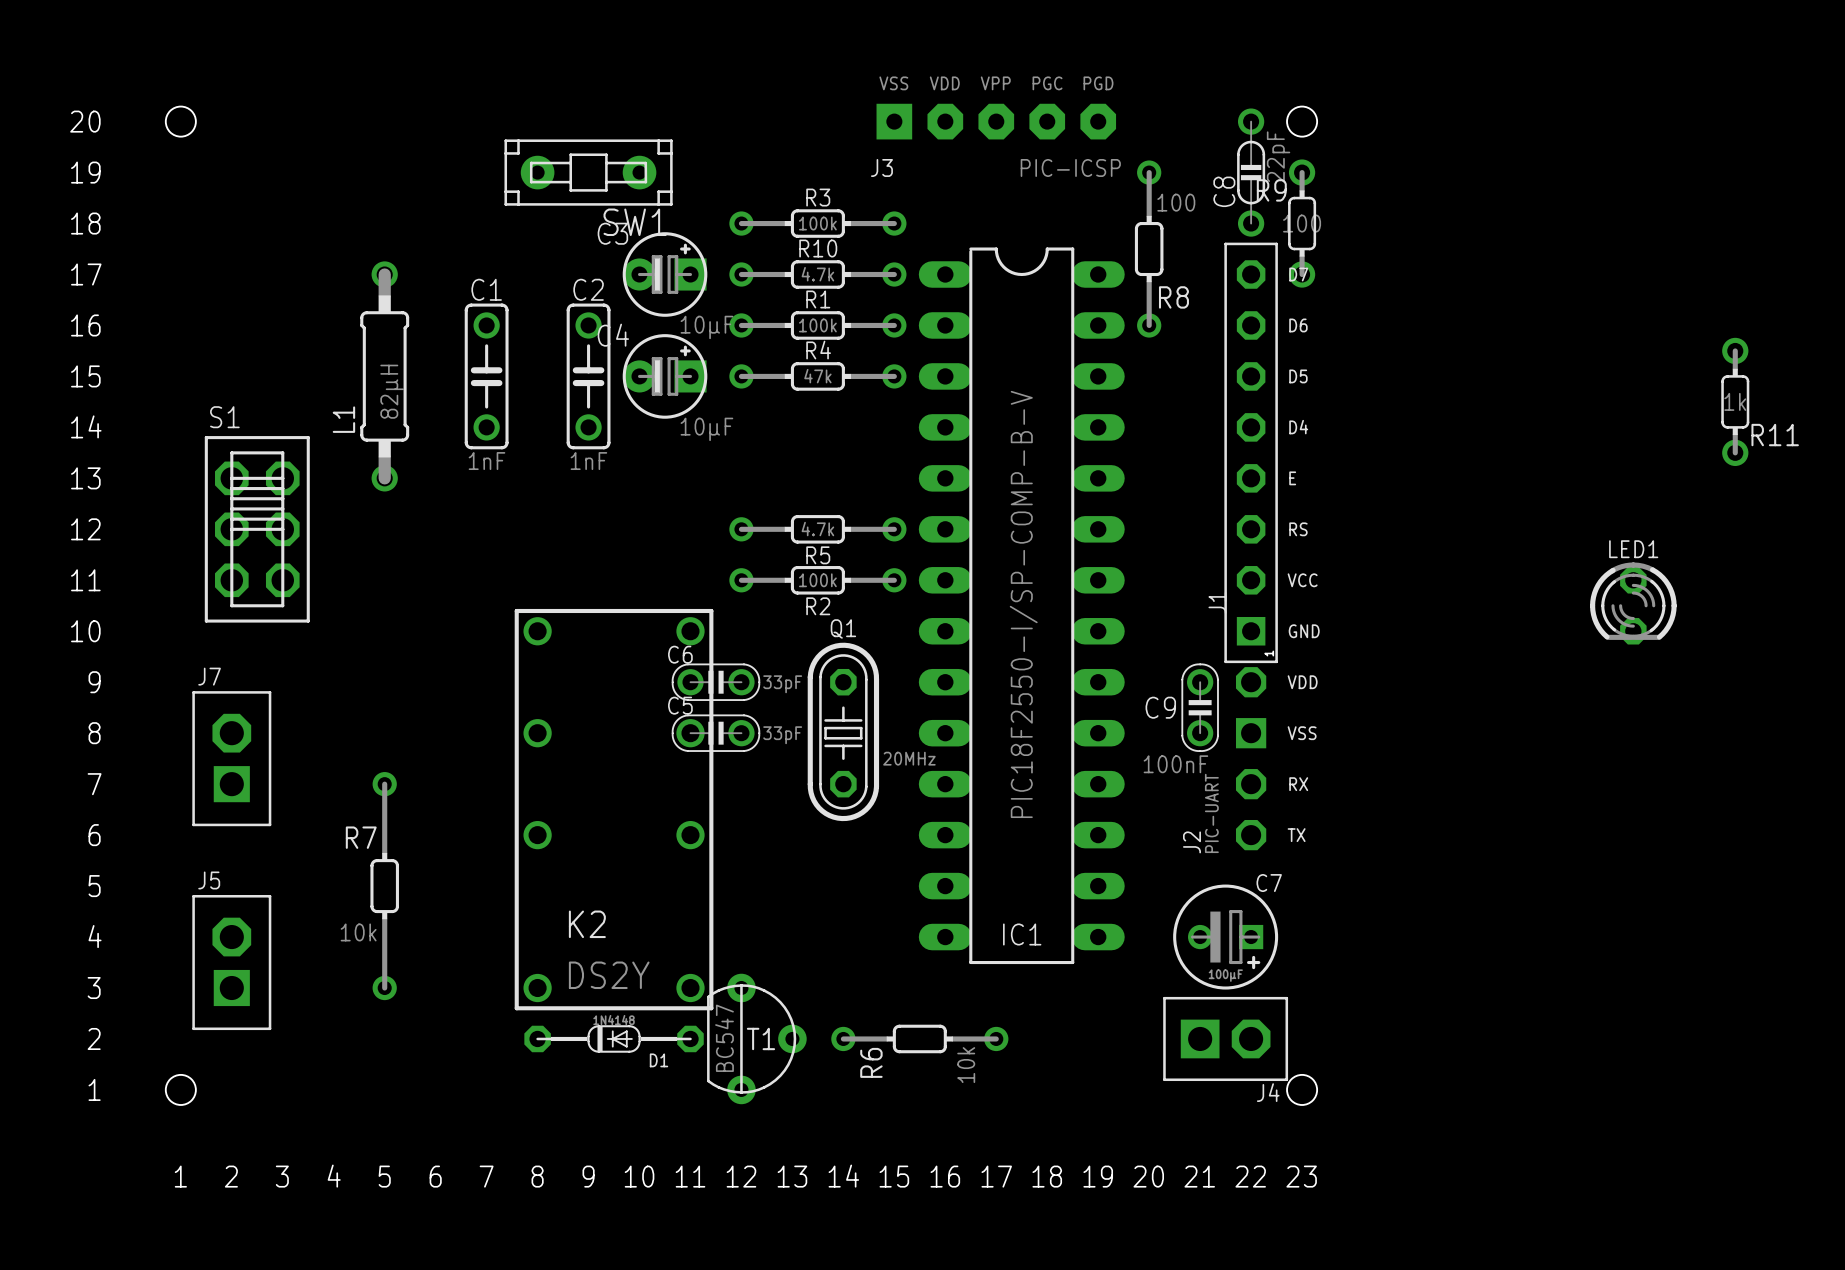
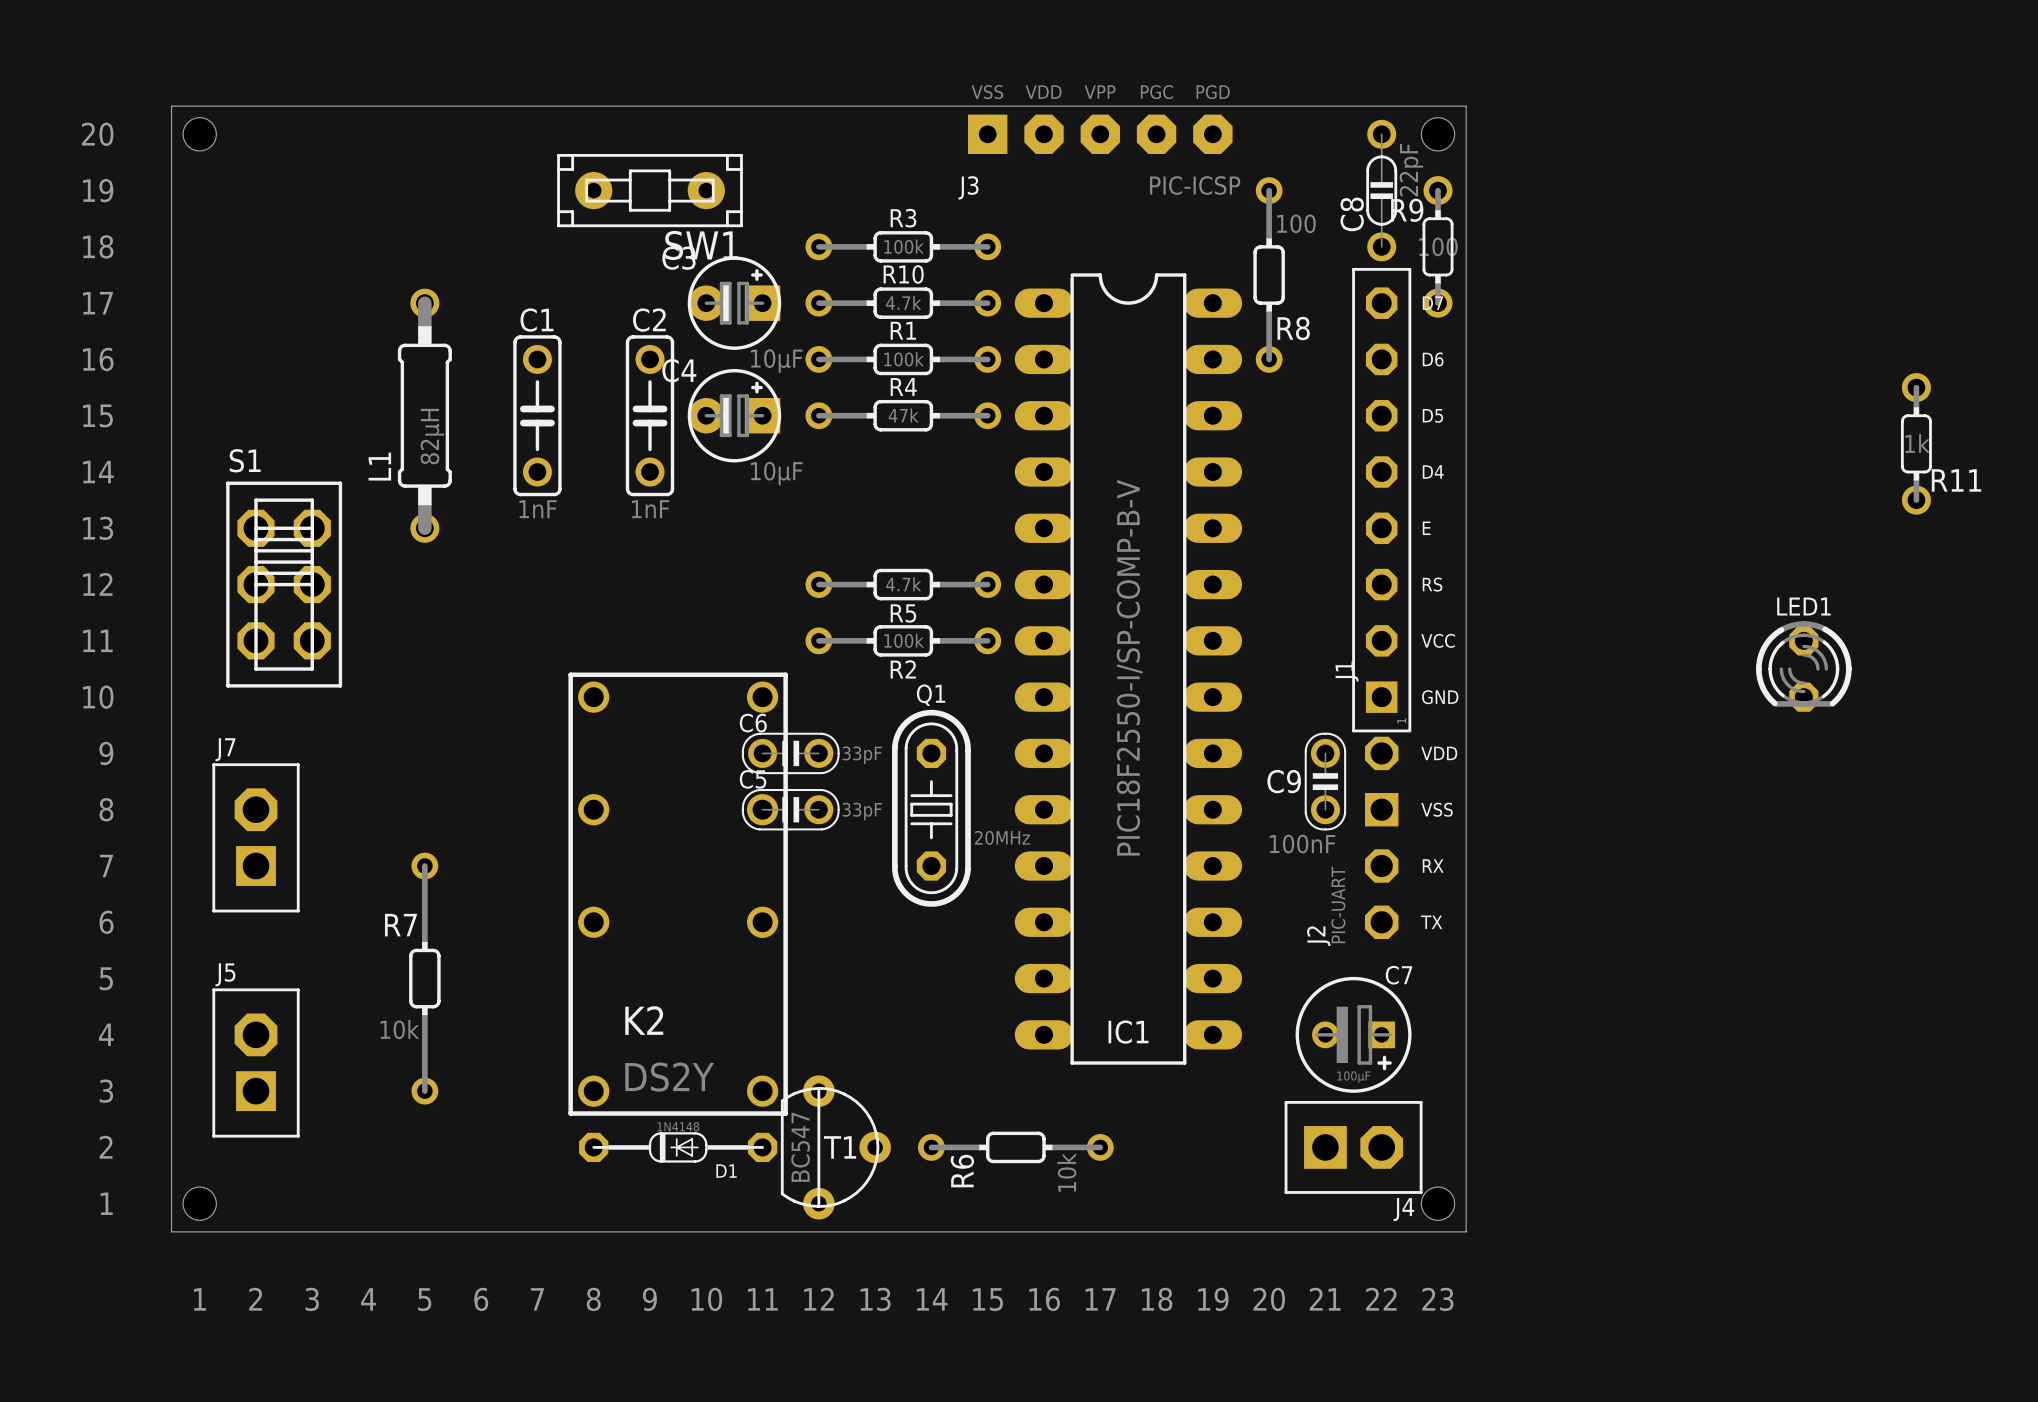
board edge: none -> (171, 106) (1466, 106) (1466, 1231) (171, 1231) (171, 106)

